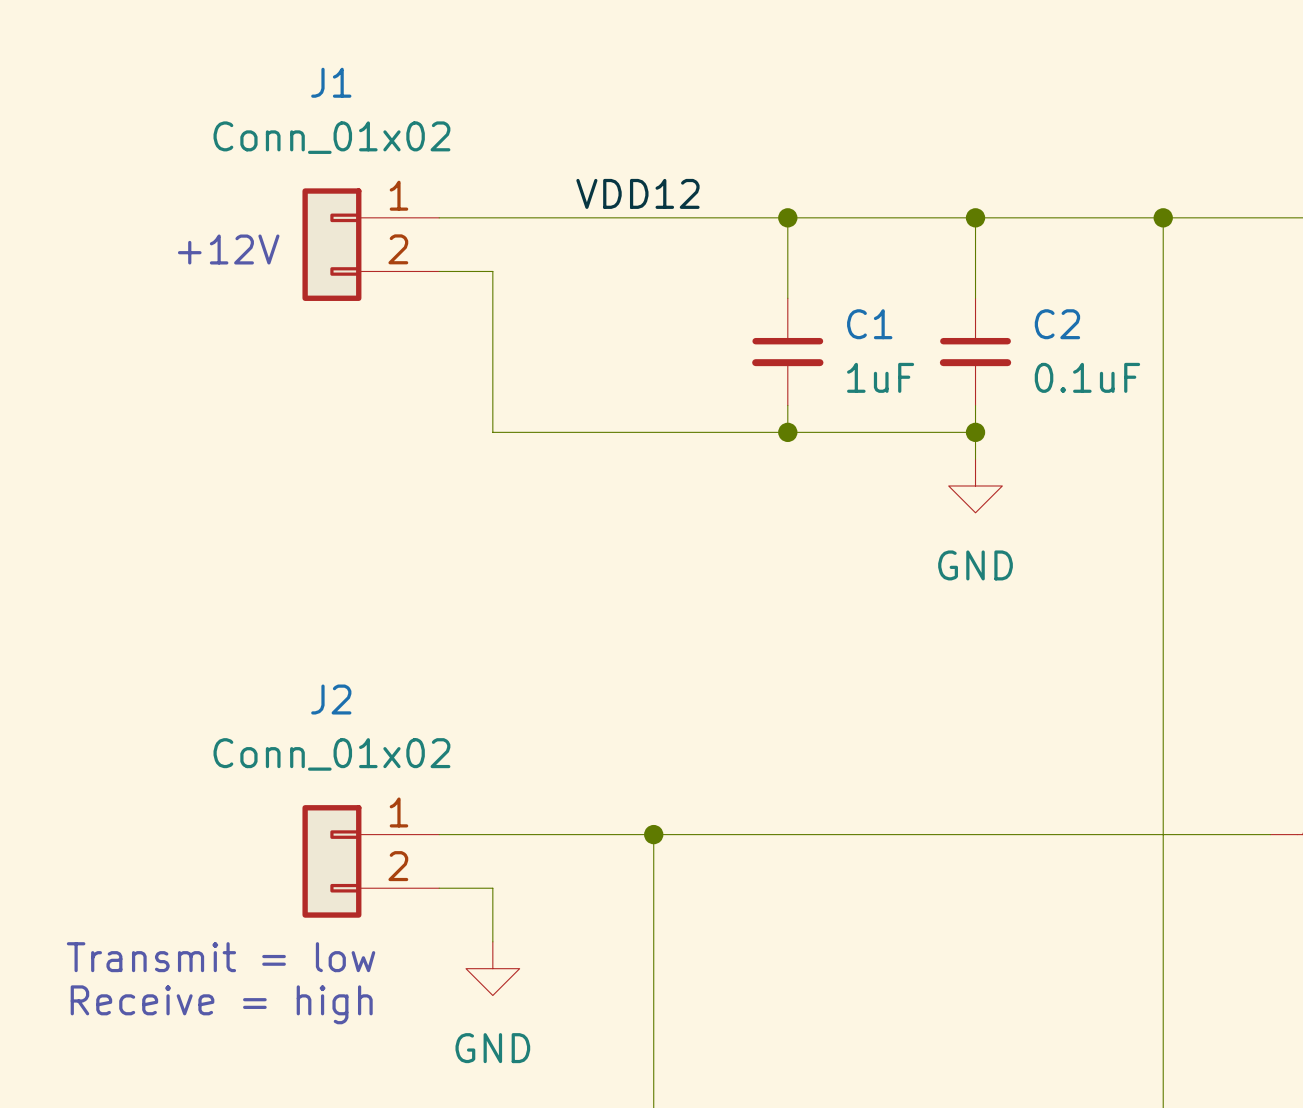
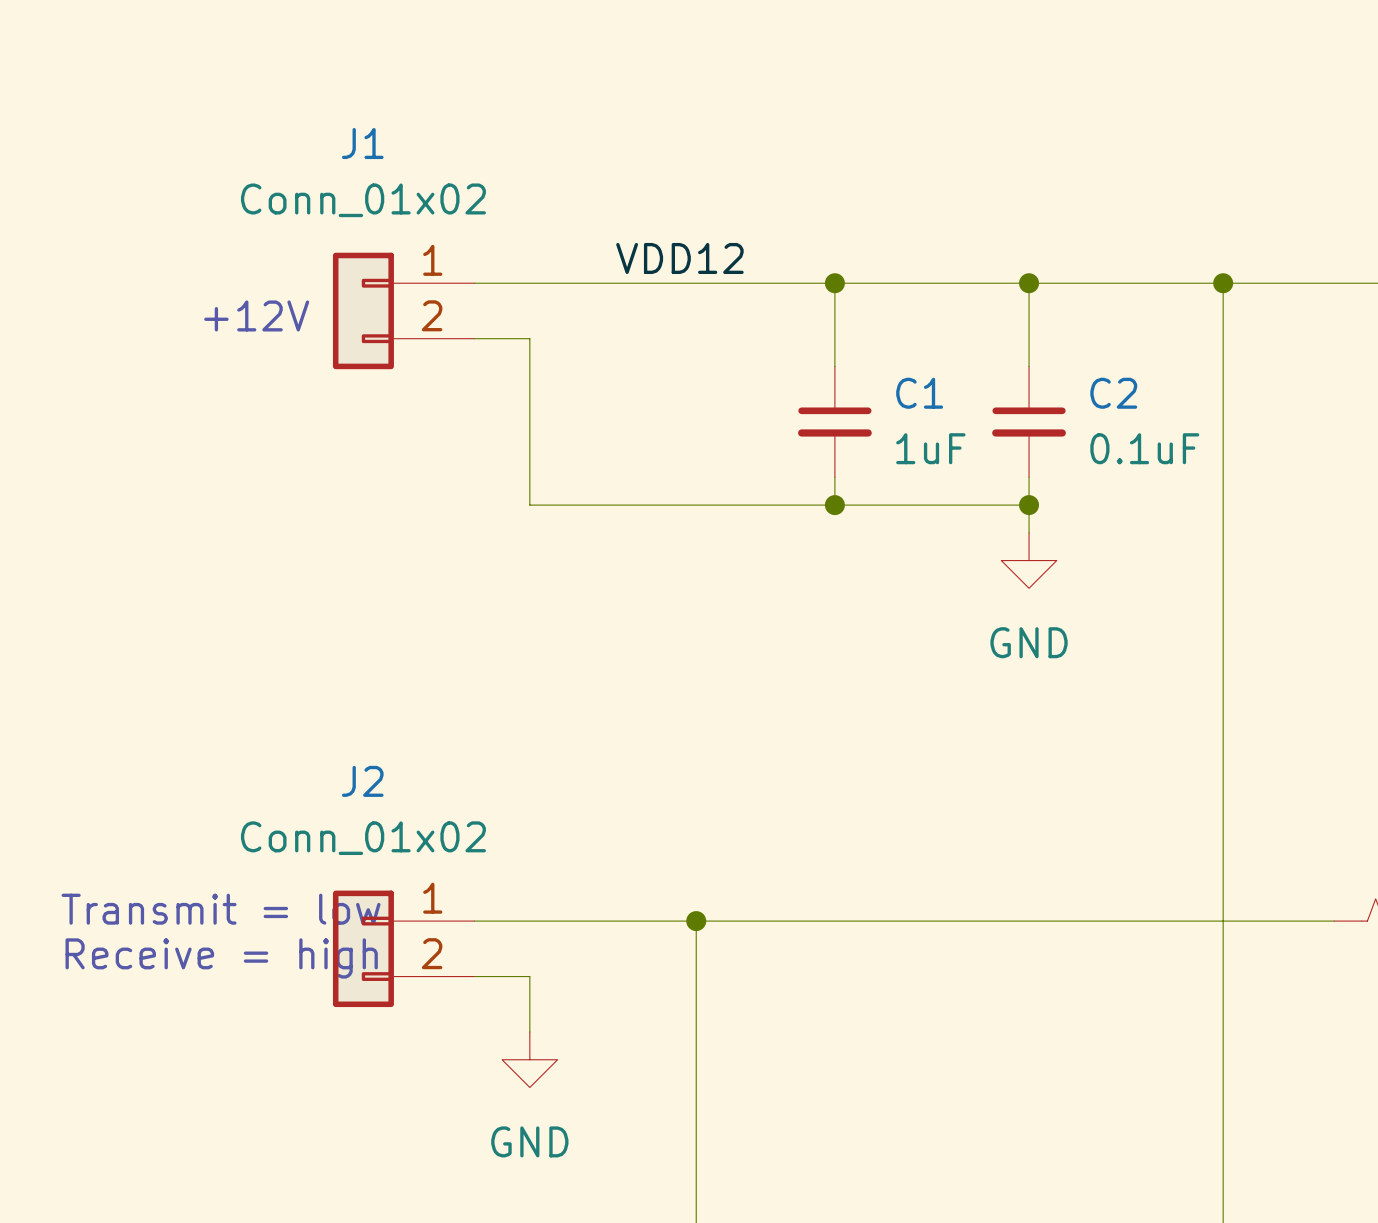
text position: Transmit = low (221, 957) -> Transmit = low (221, 909)
text position: Receive = high (221, 1004) -> Receive = high (221, 958)

